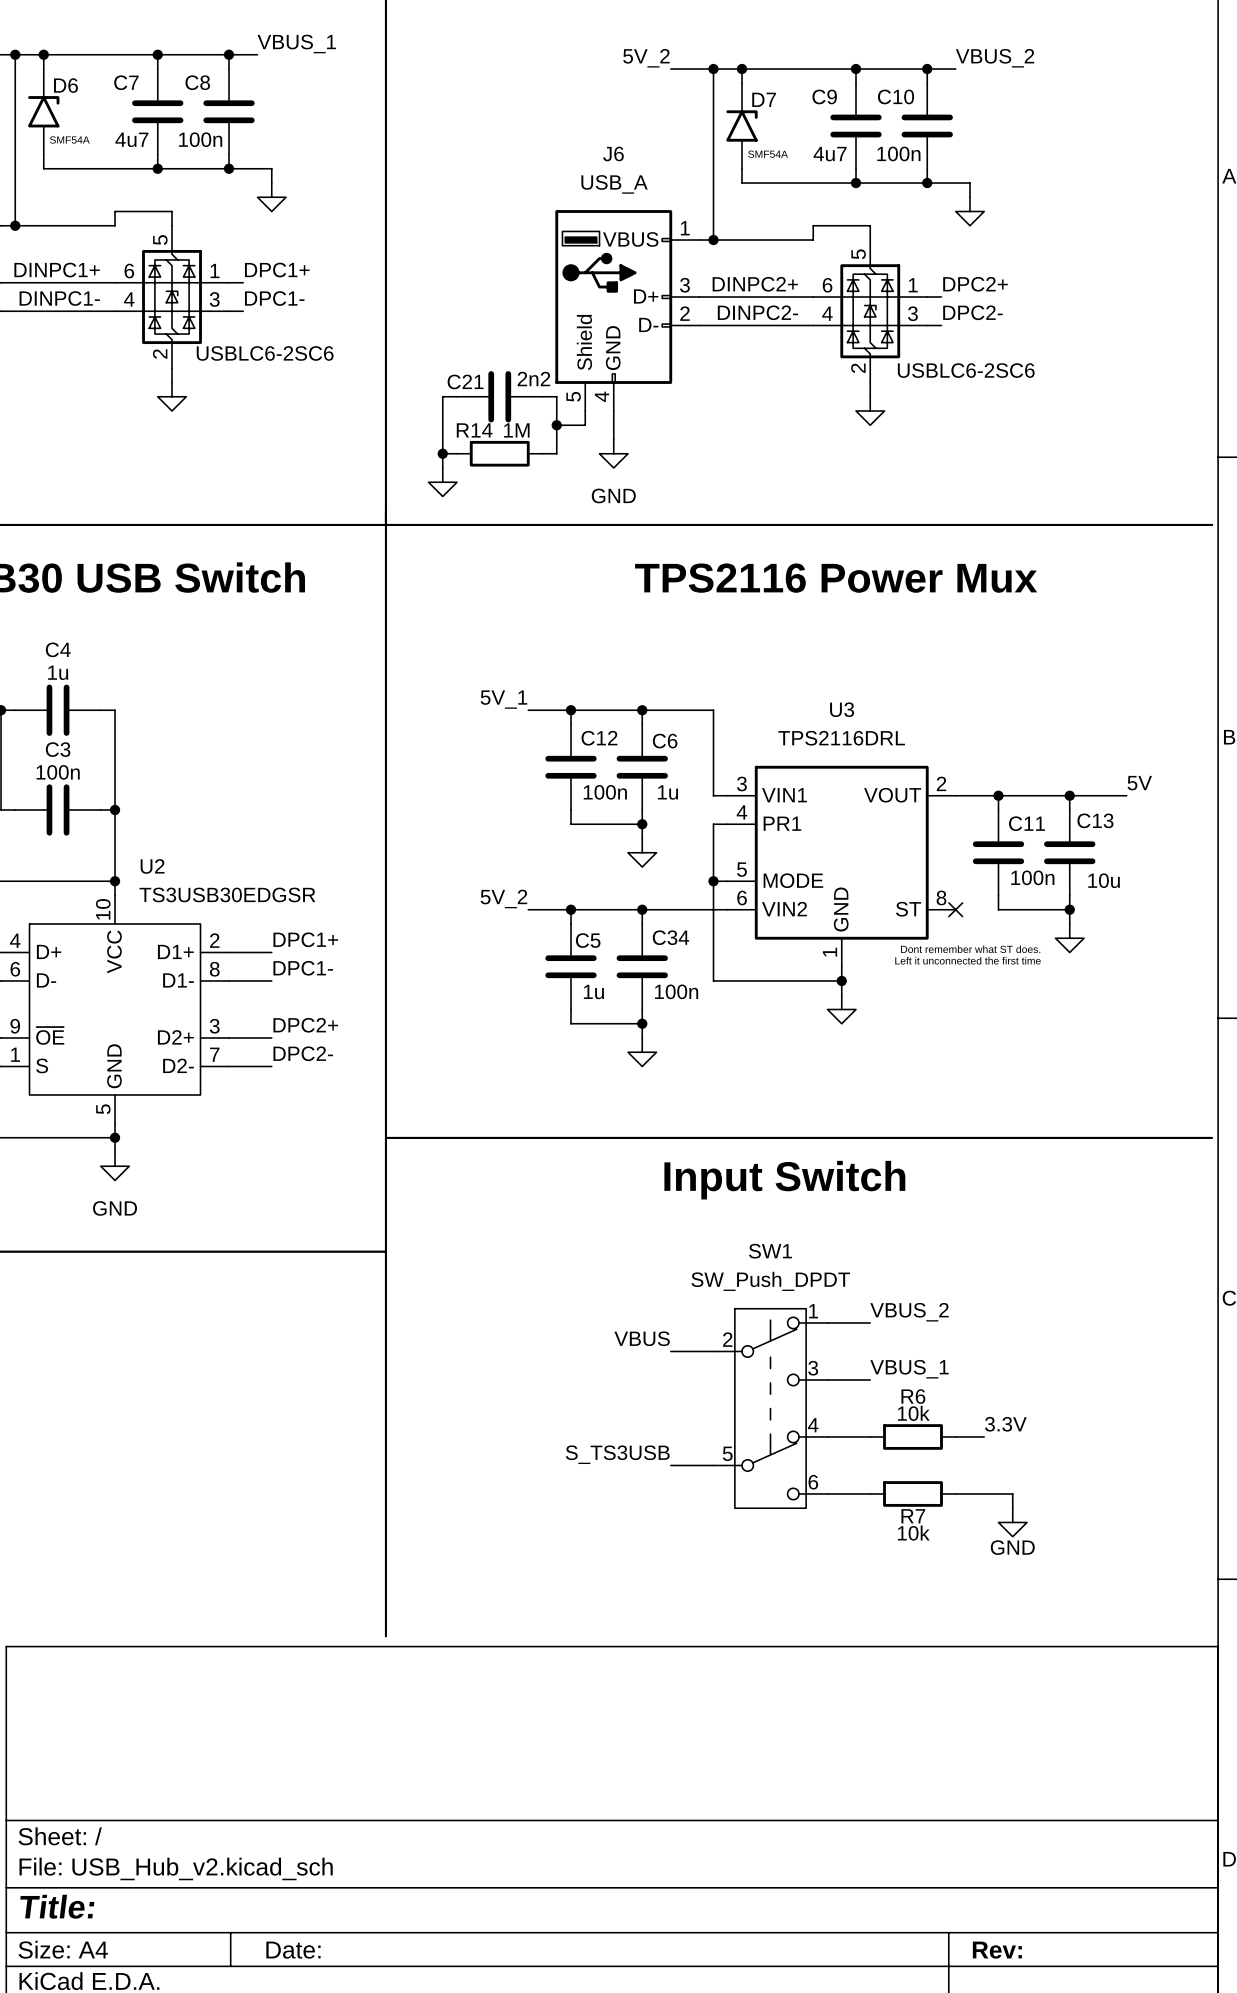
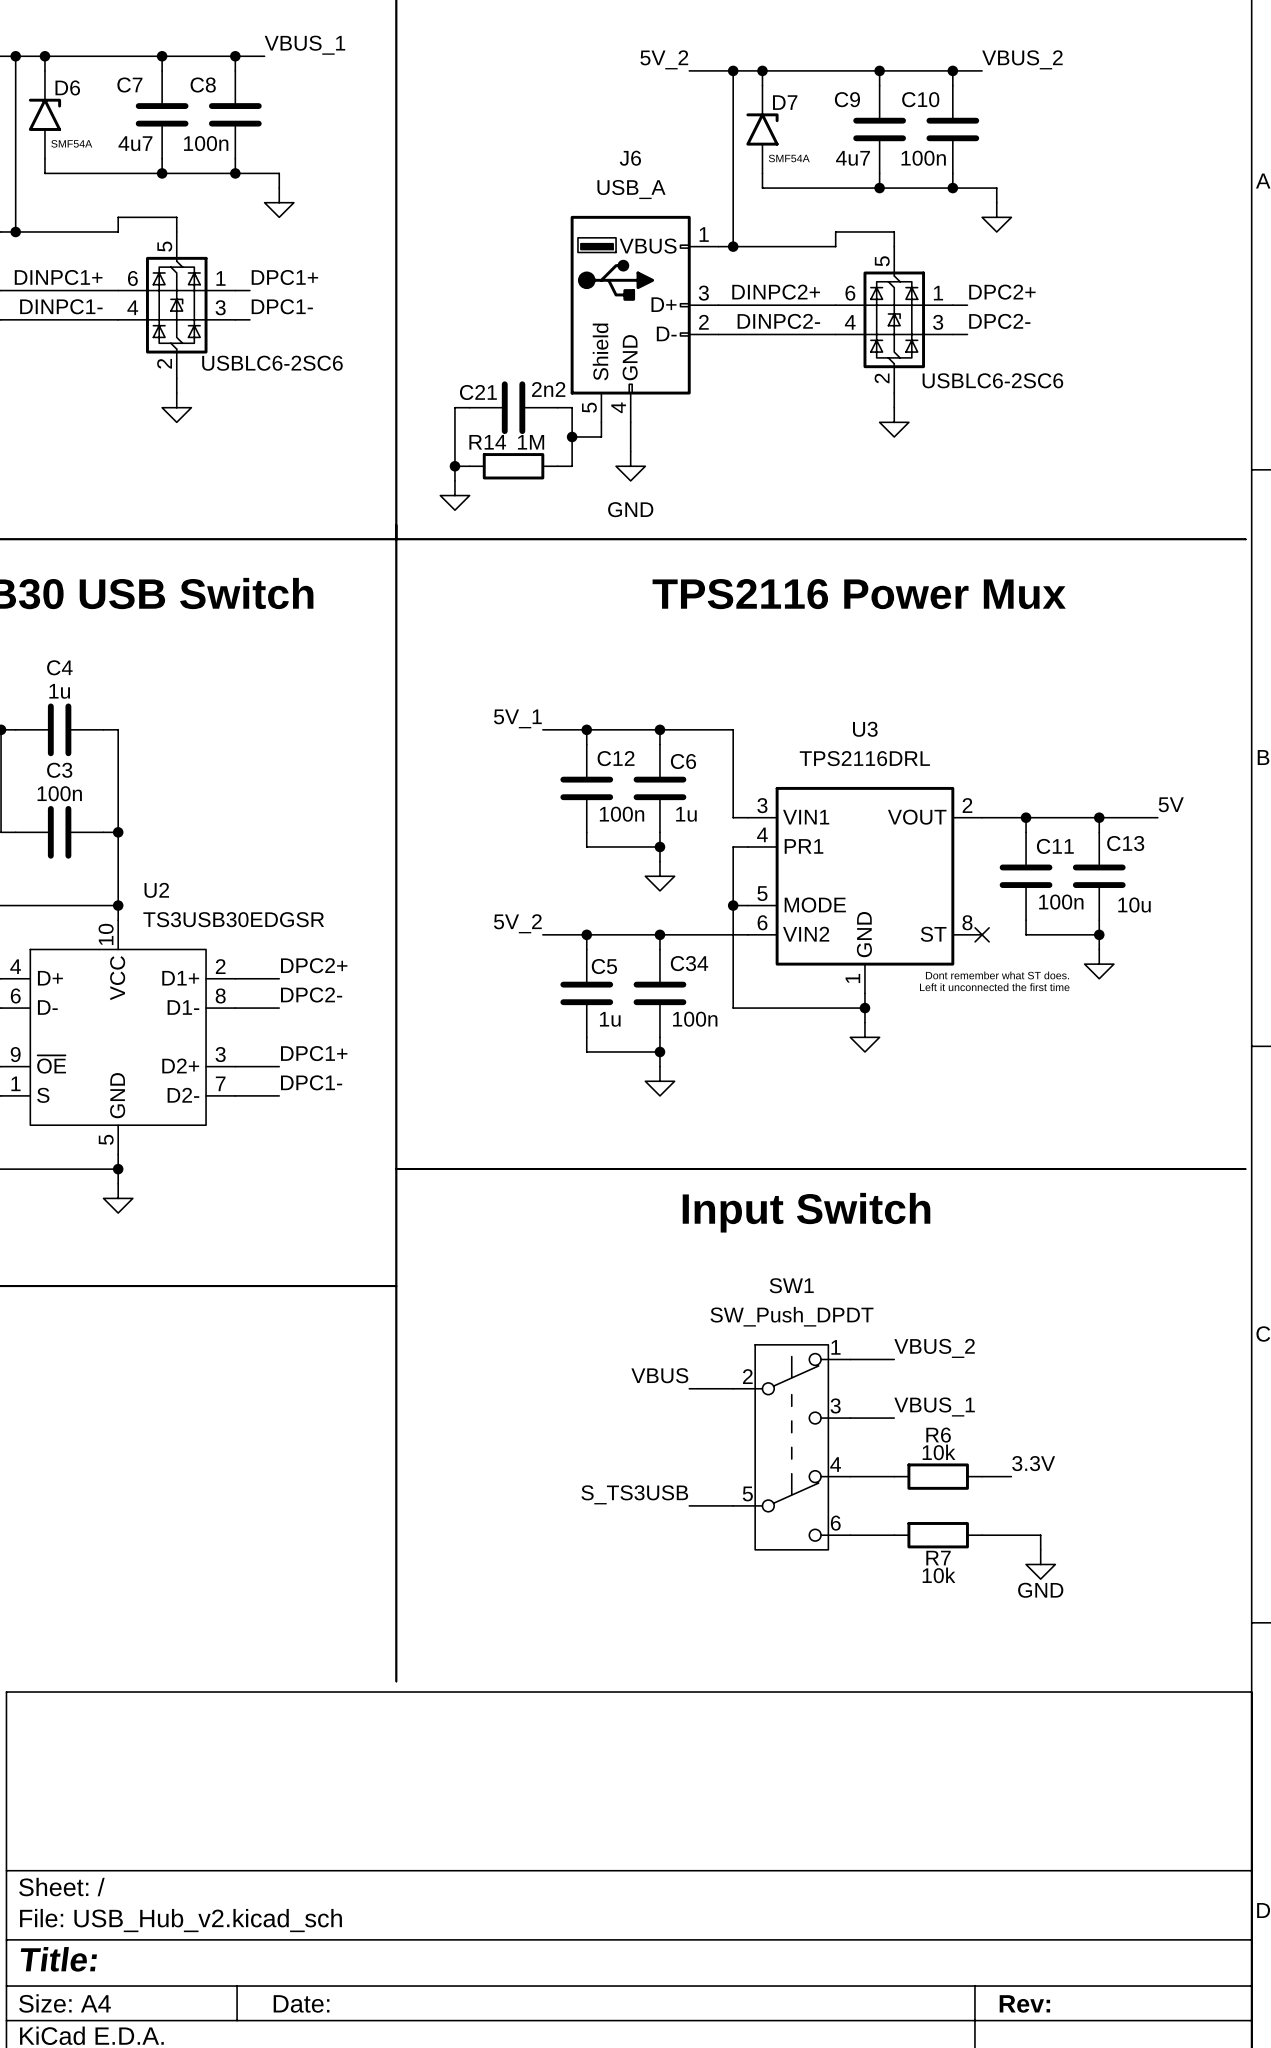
label: DPC1+ (305, 939) -> DPC2+ (314, 965)
label: DPC1- (303, 968) -> DPC2- (311, 994)
label: DPC2+ (305, 1025) -> DPC1+ (314, 1053)
label: DPC2- (303, 1053) -> DPC1- (311, 1082)
power symbol text: GND (115, 1208) -> none

